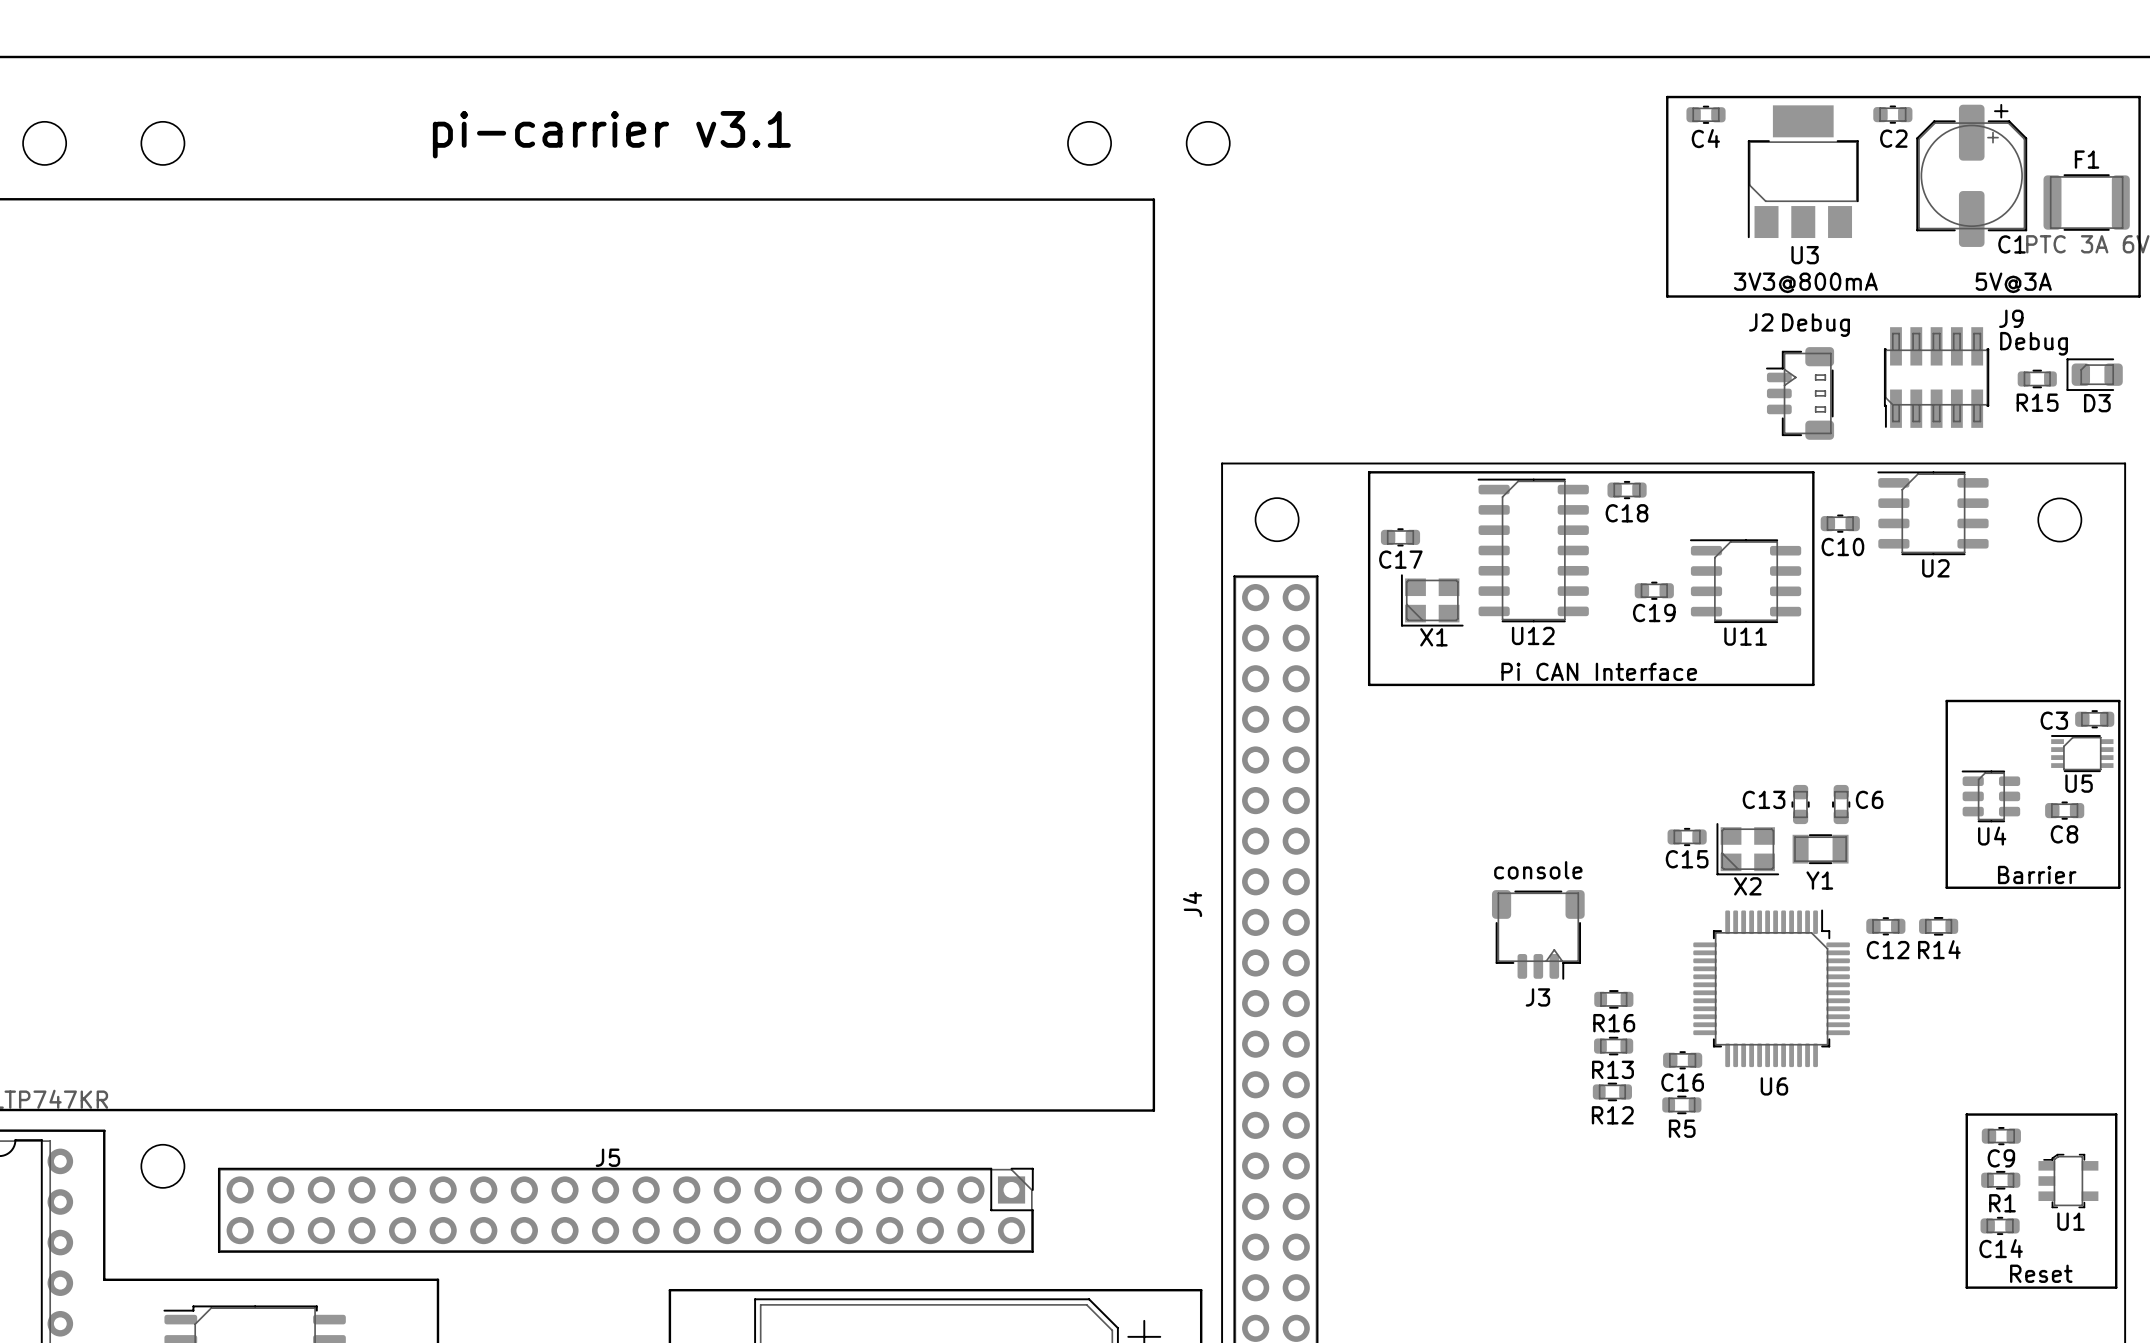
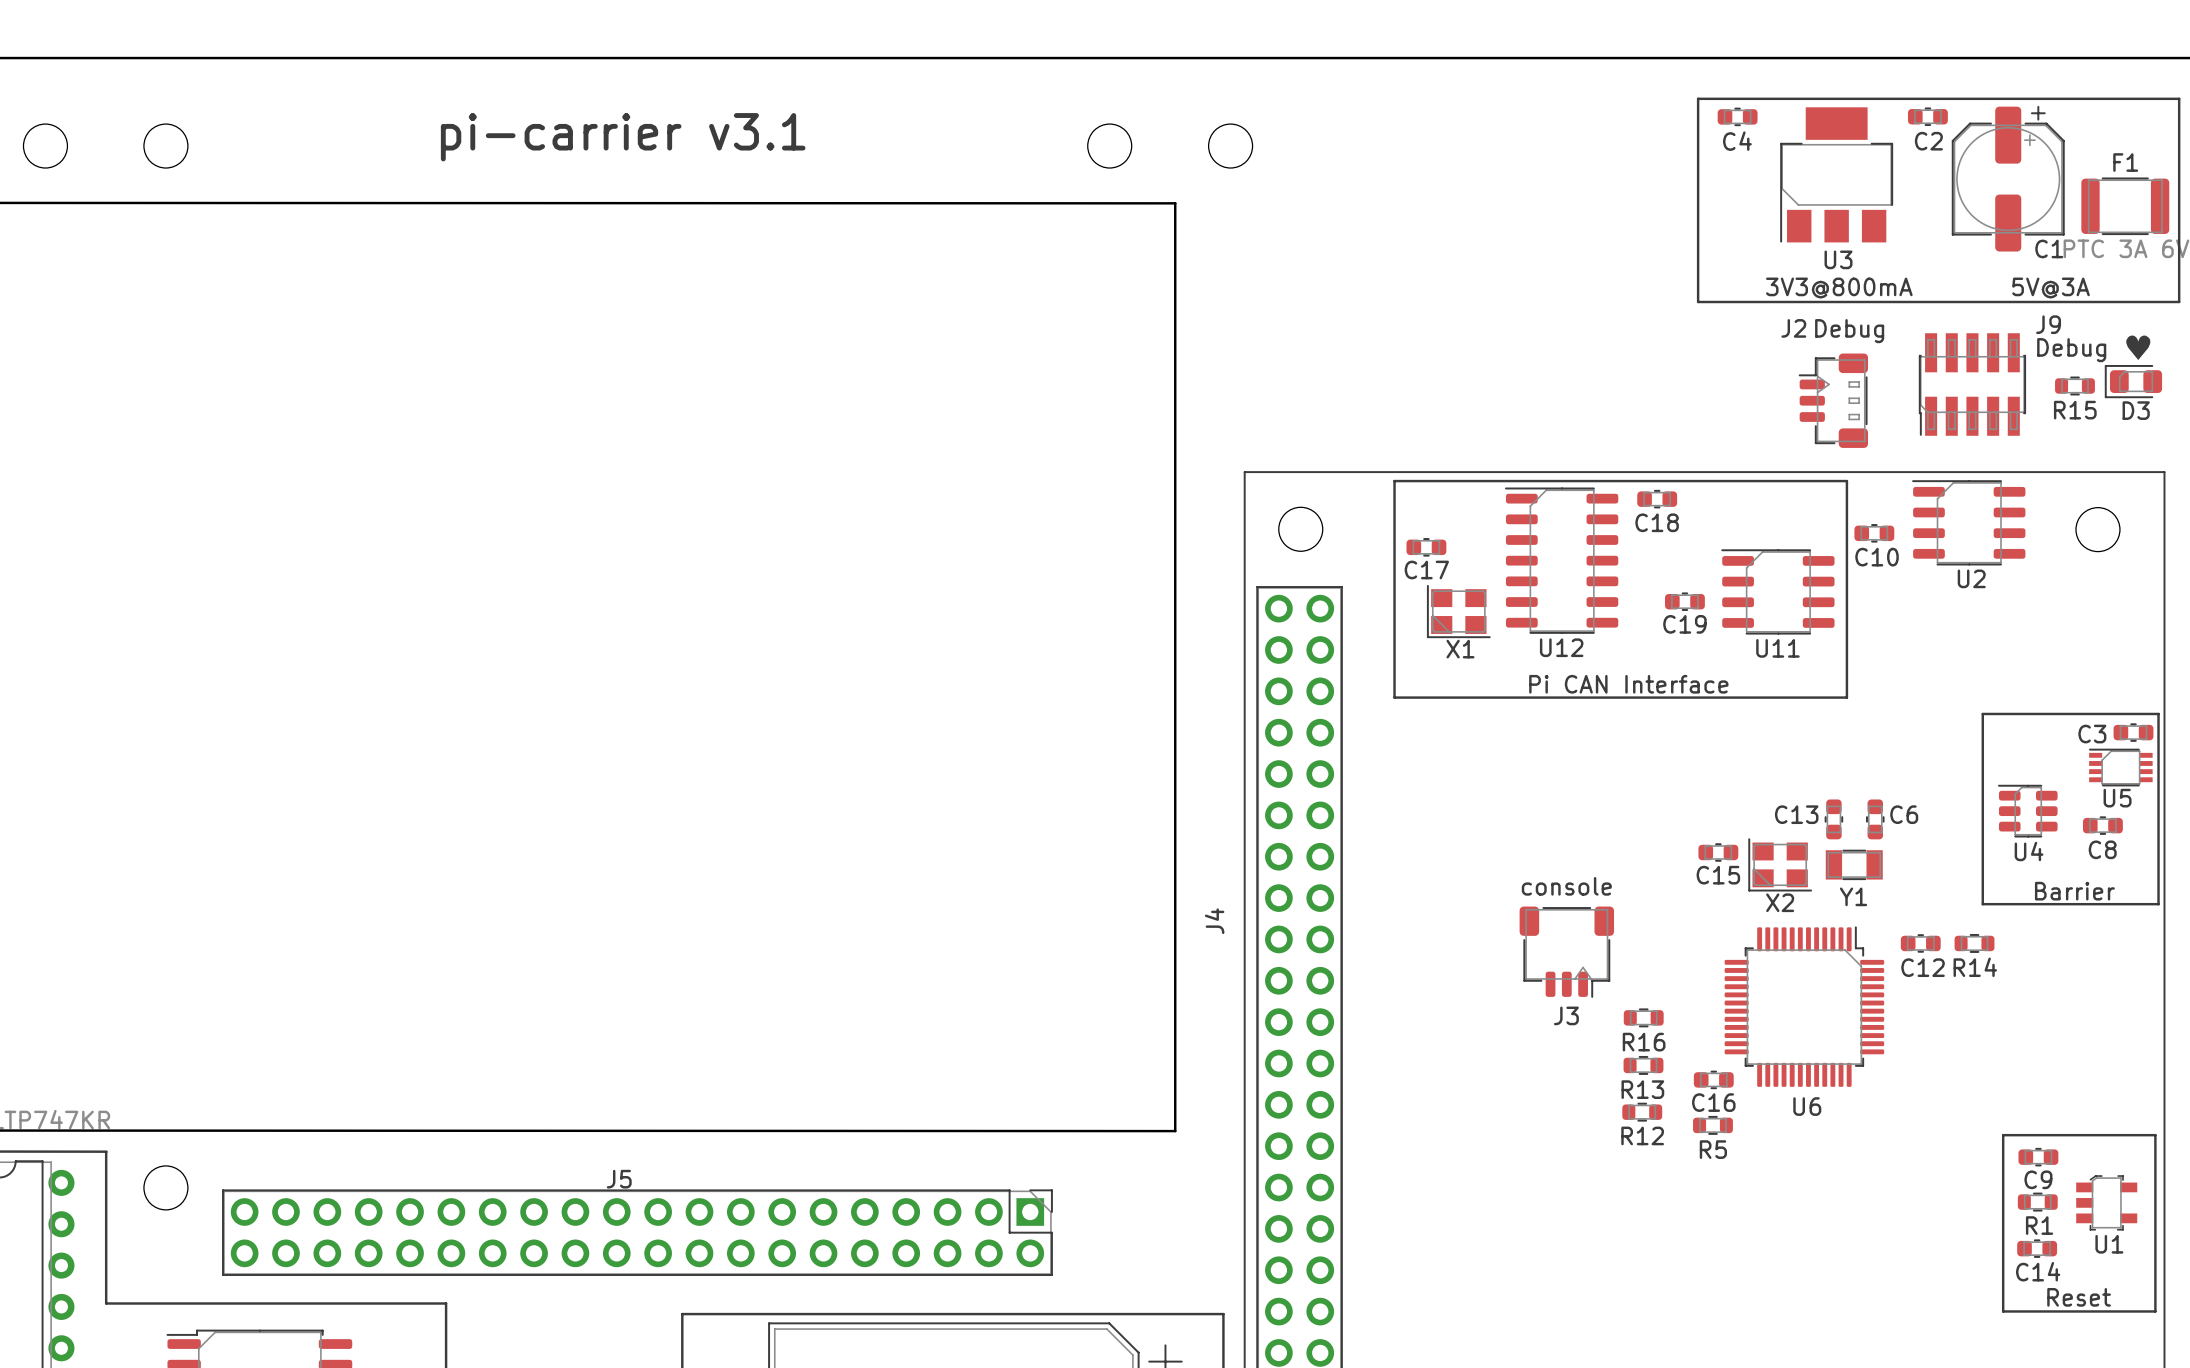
text: none -> ♥ (2138, 347)
U1 footprint: [2038, 1153, 2099, 1209] -> [2076, 1175, 2138, 1231]

